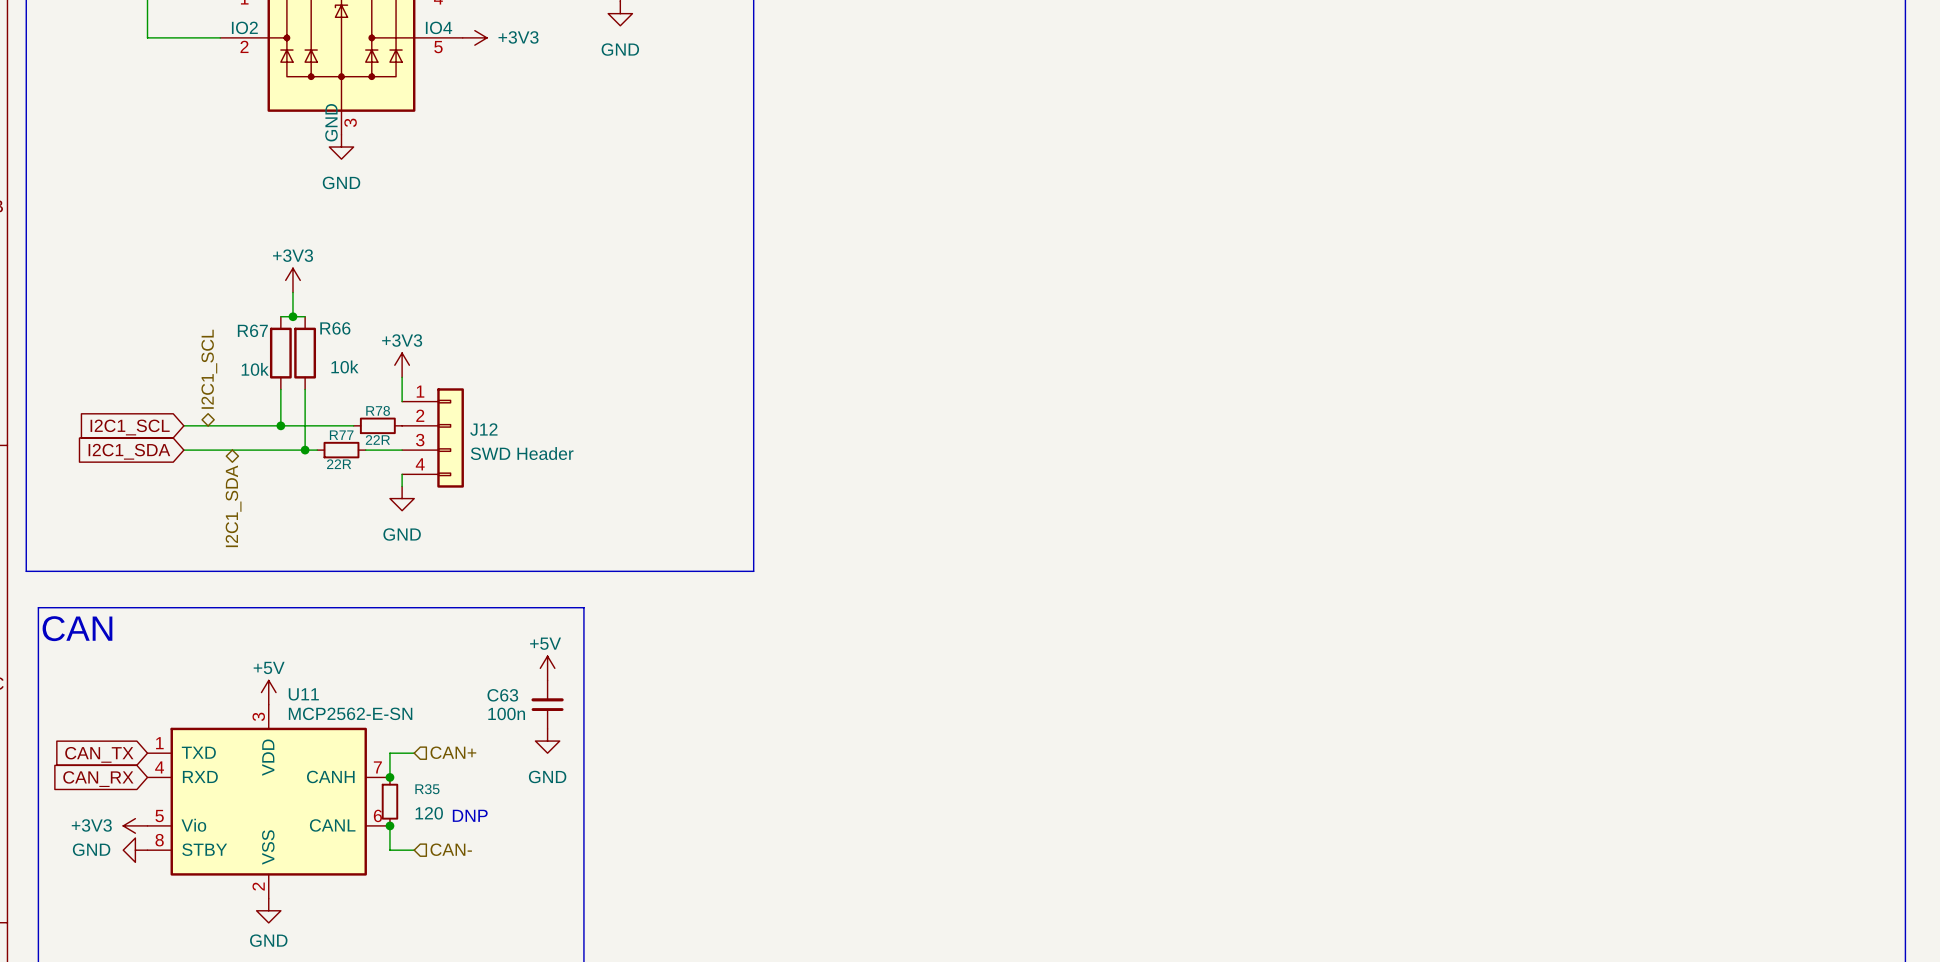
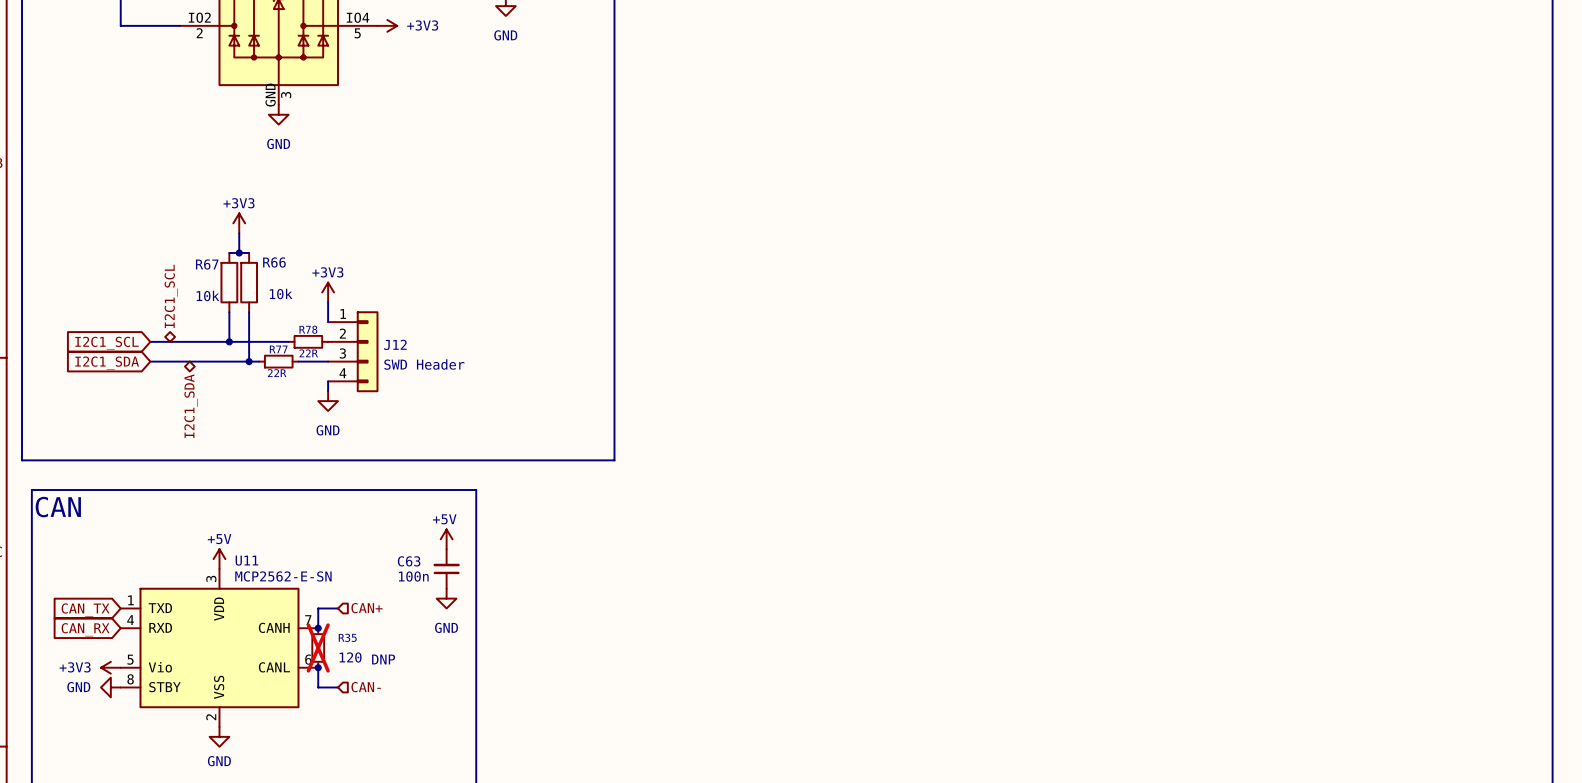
R35 do-not-place cross: none -> (318, 647)

